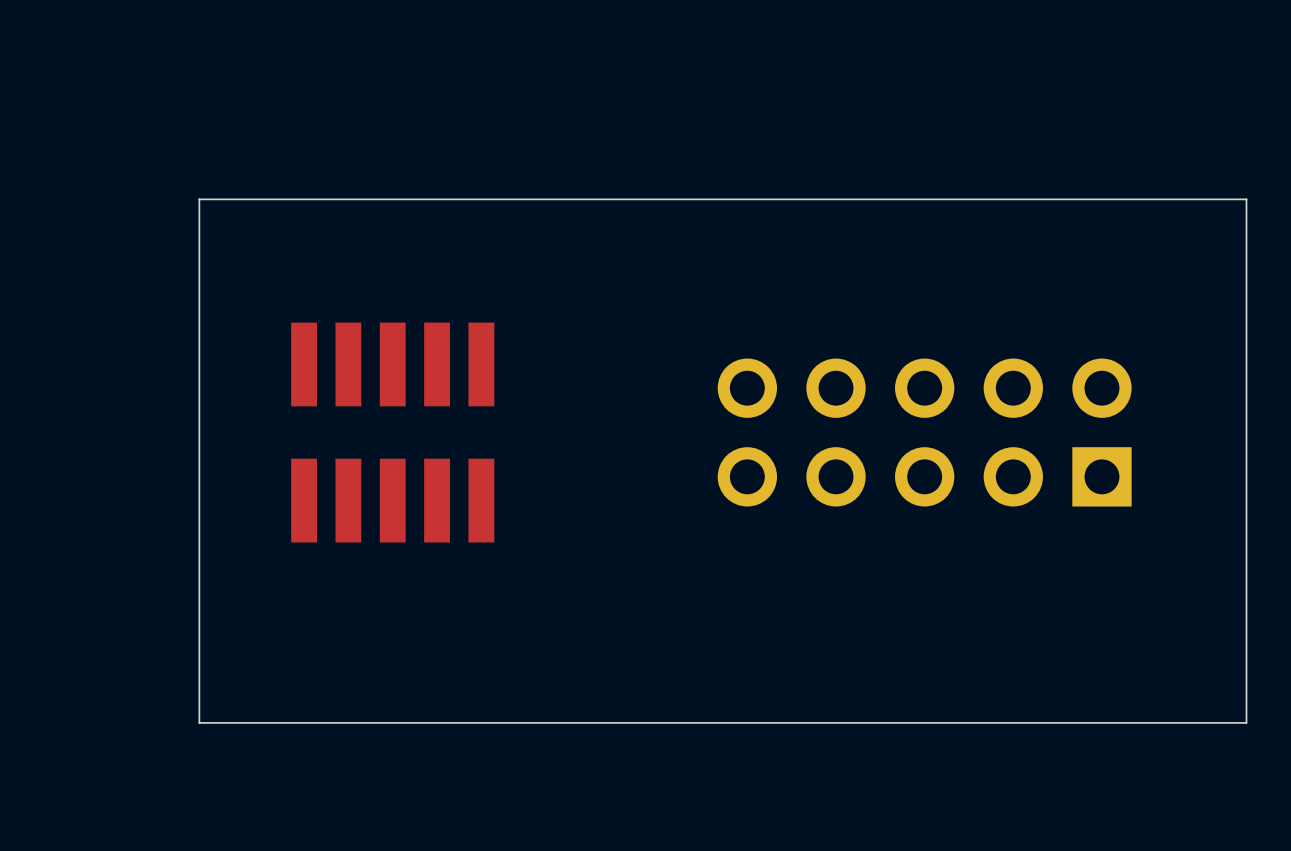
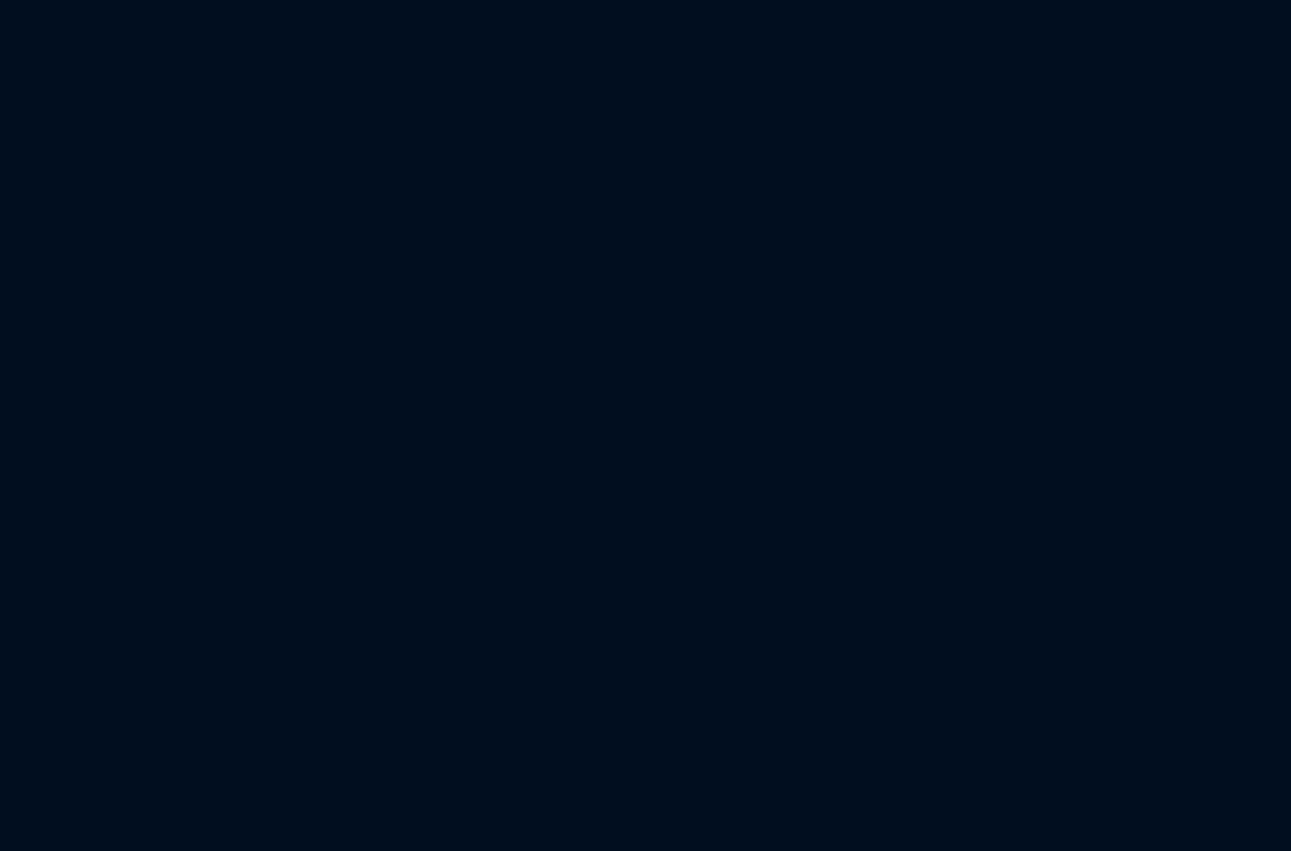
board edge: (1246, 199) (199, 199) (199, 722) (1246, 722) (1246, 199) -> none
part: (392, 432) -> none
part: (924, 432) -> none

